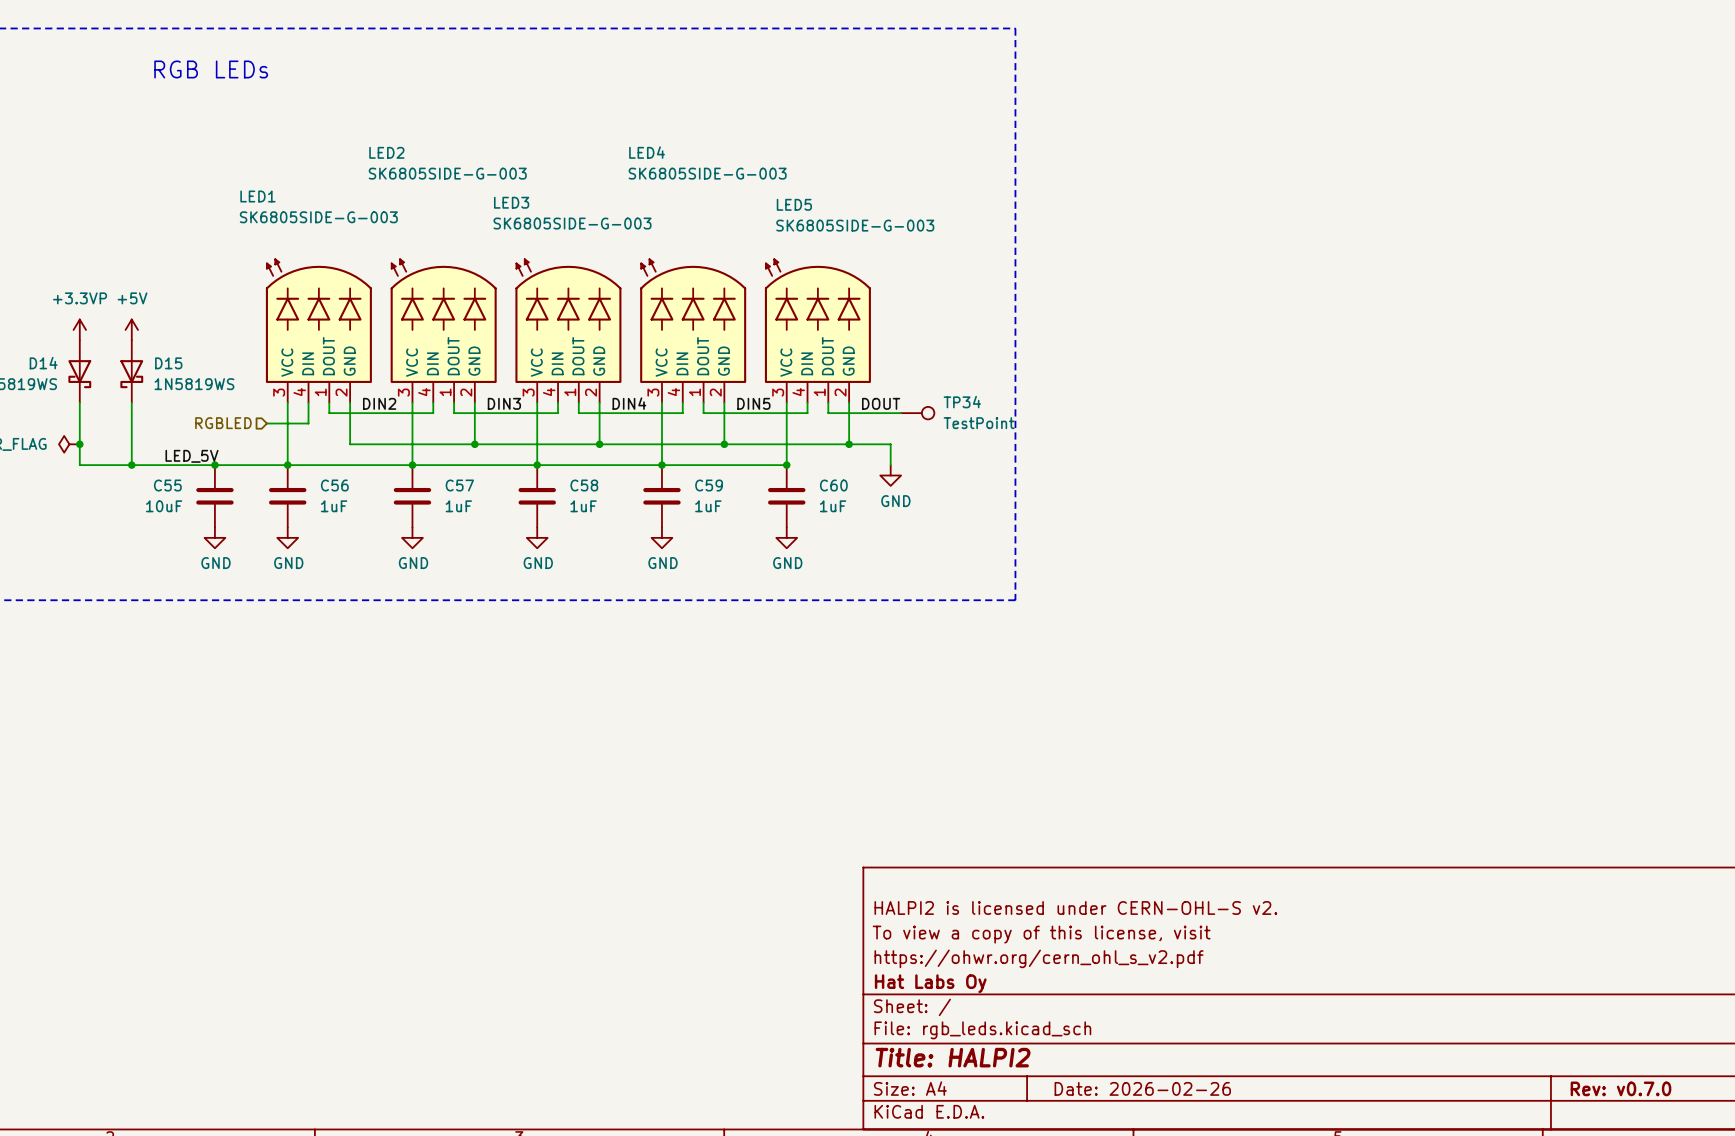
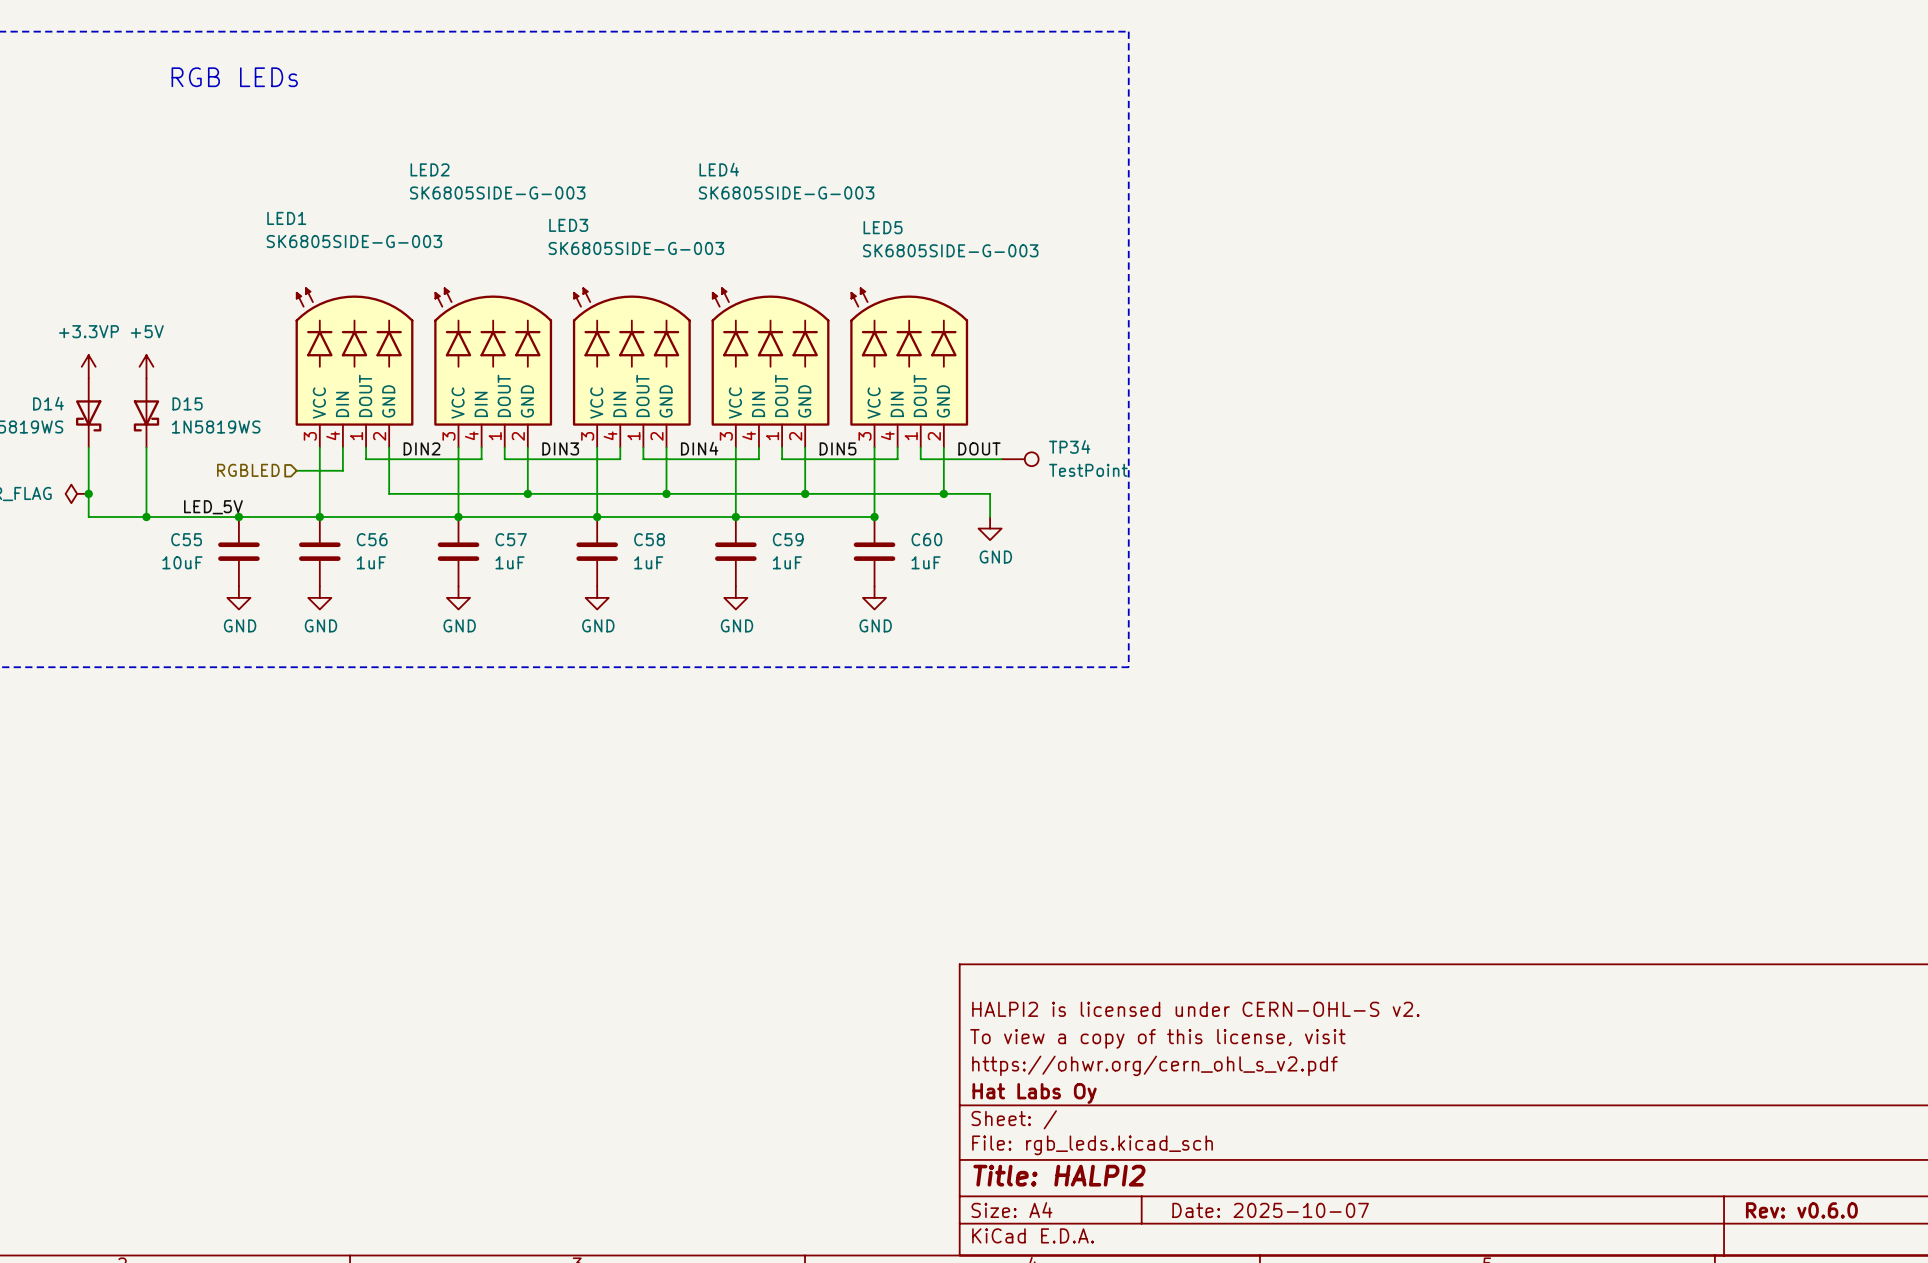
title block: Date: 2026-02-26 (1142, 1088) -> Date: 2025-10-07 (1270, 1210)
title block: Rev: v0.7.0 (1620, 1088) -> Rev: v0.6.0 (1801, 1210)

